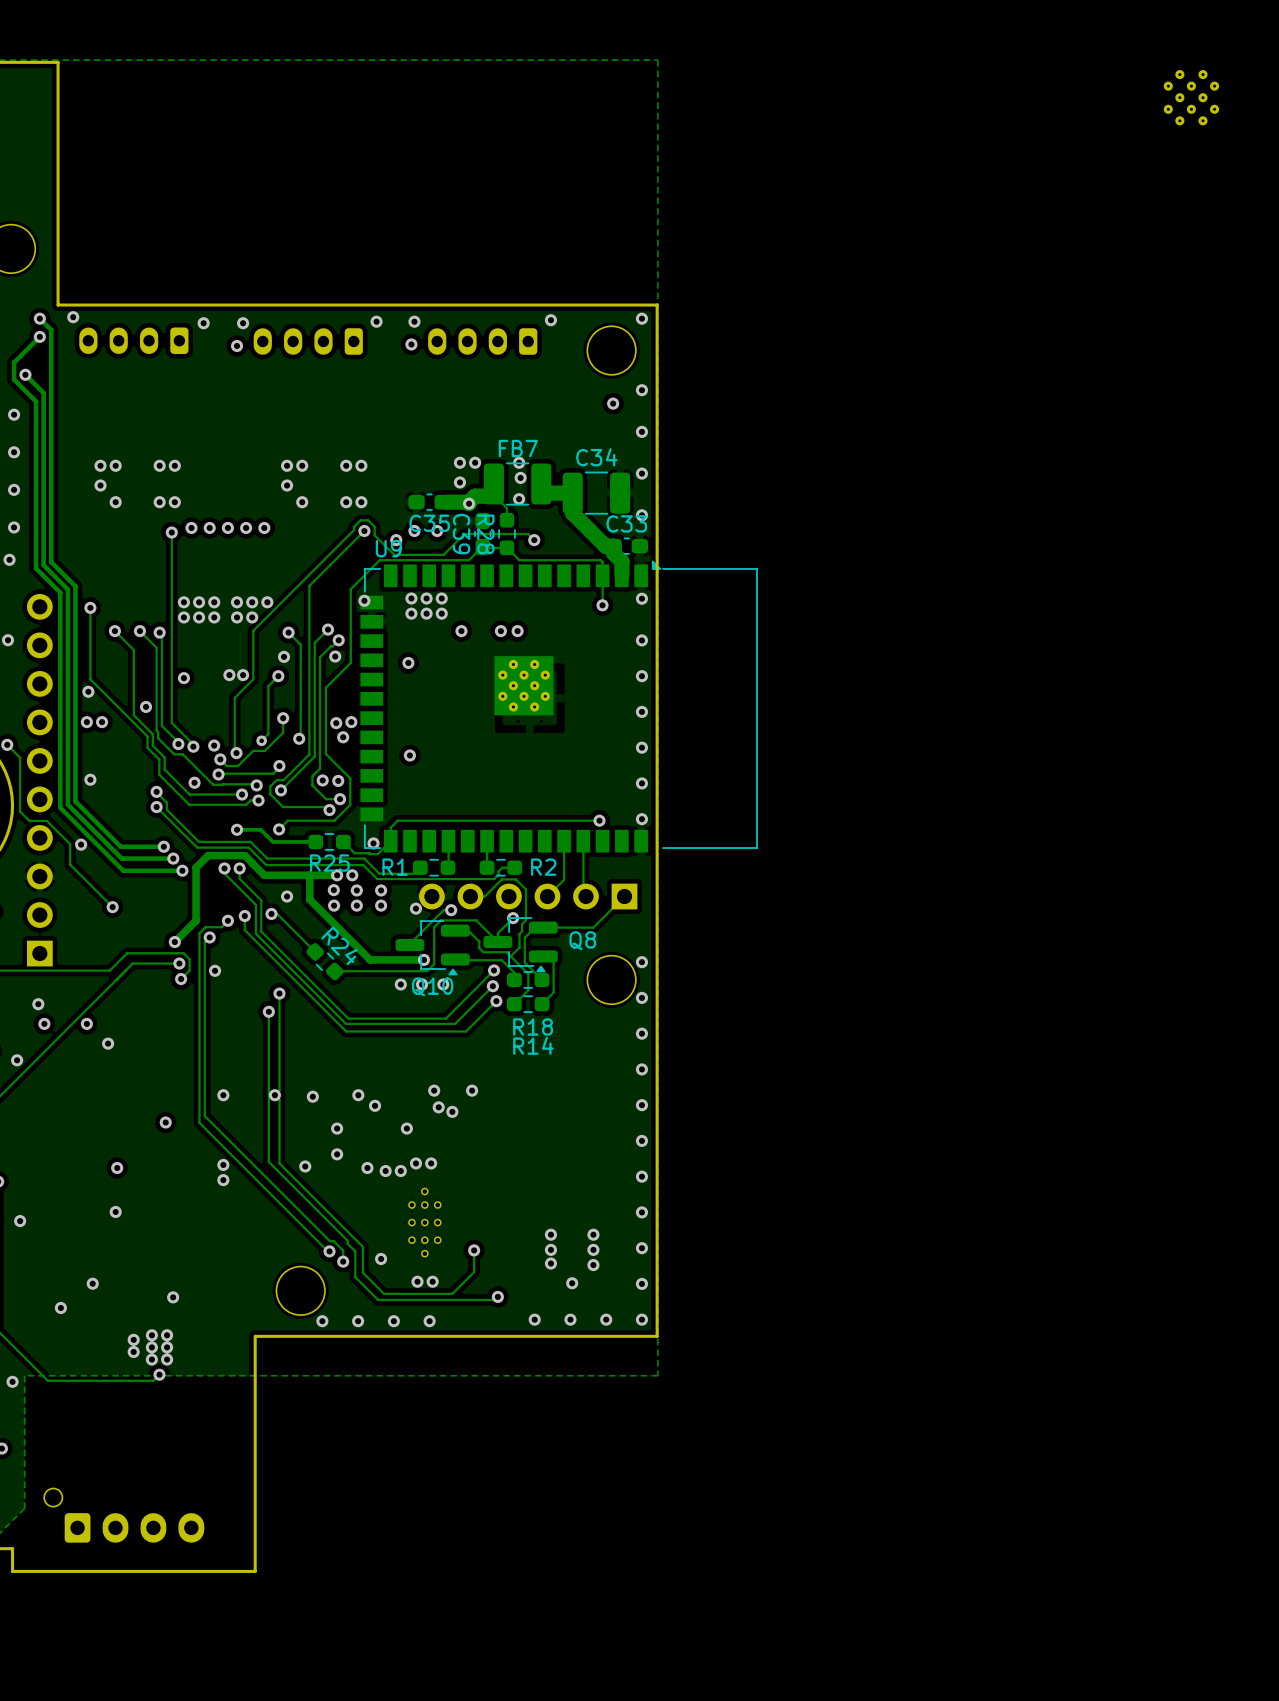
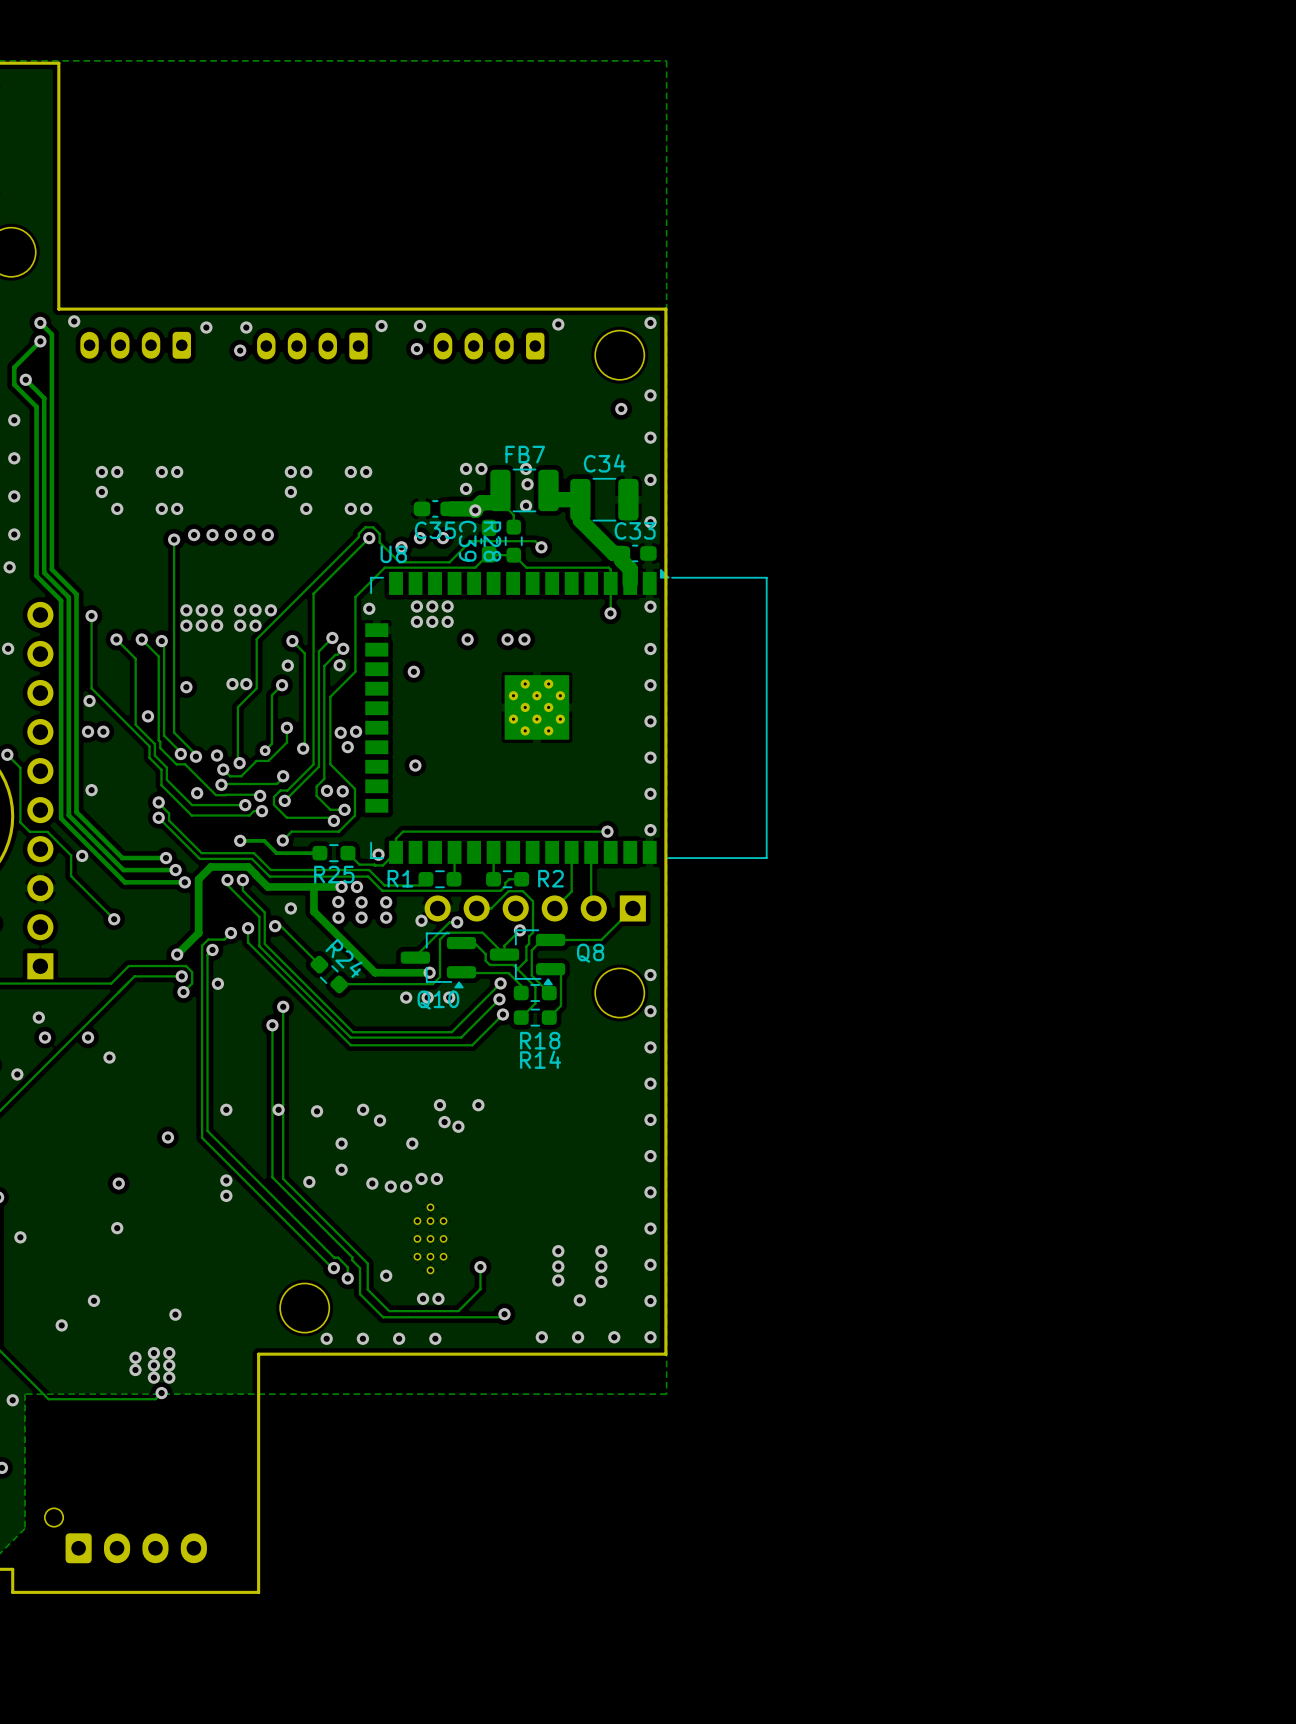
part: (1191, 97) -> none
U9: (559, 706) -> none
U8: none -> (566, 716)

